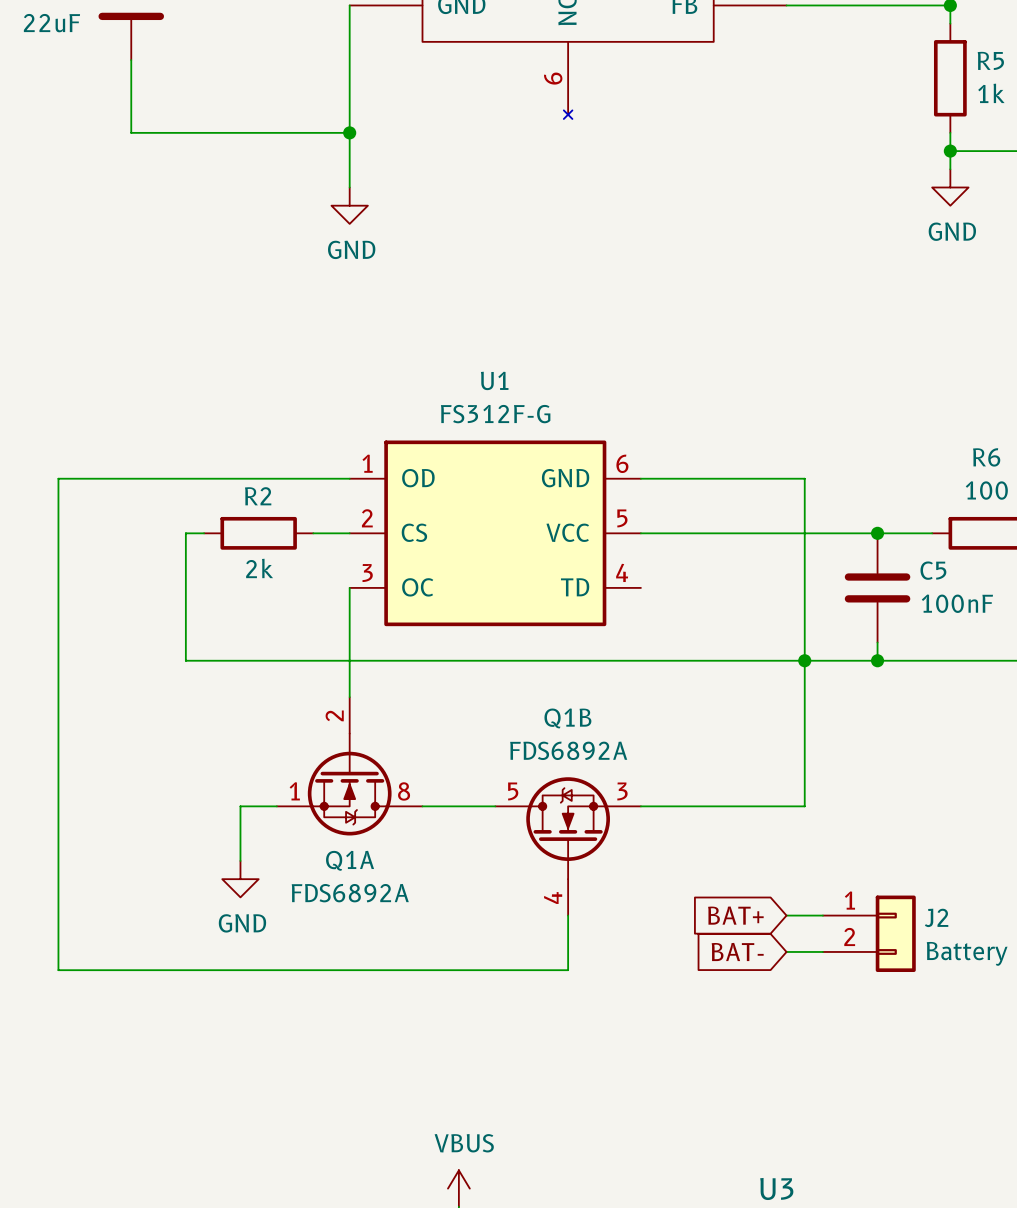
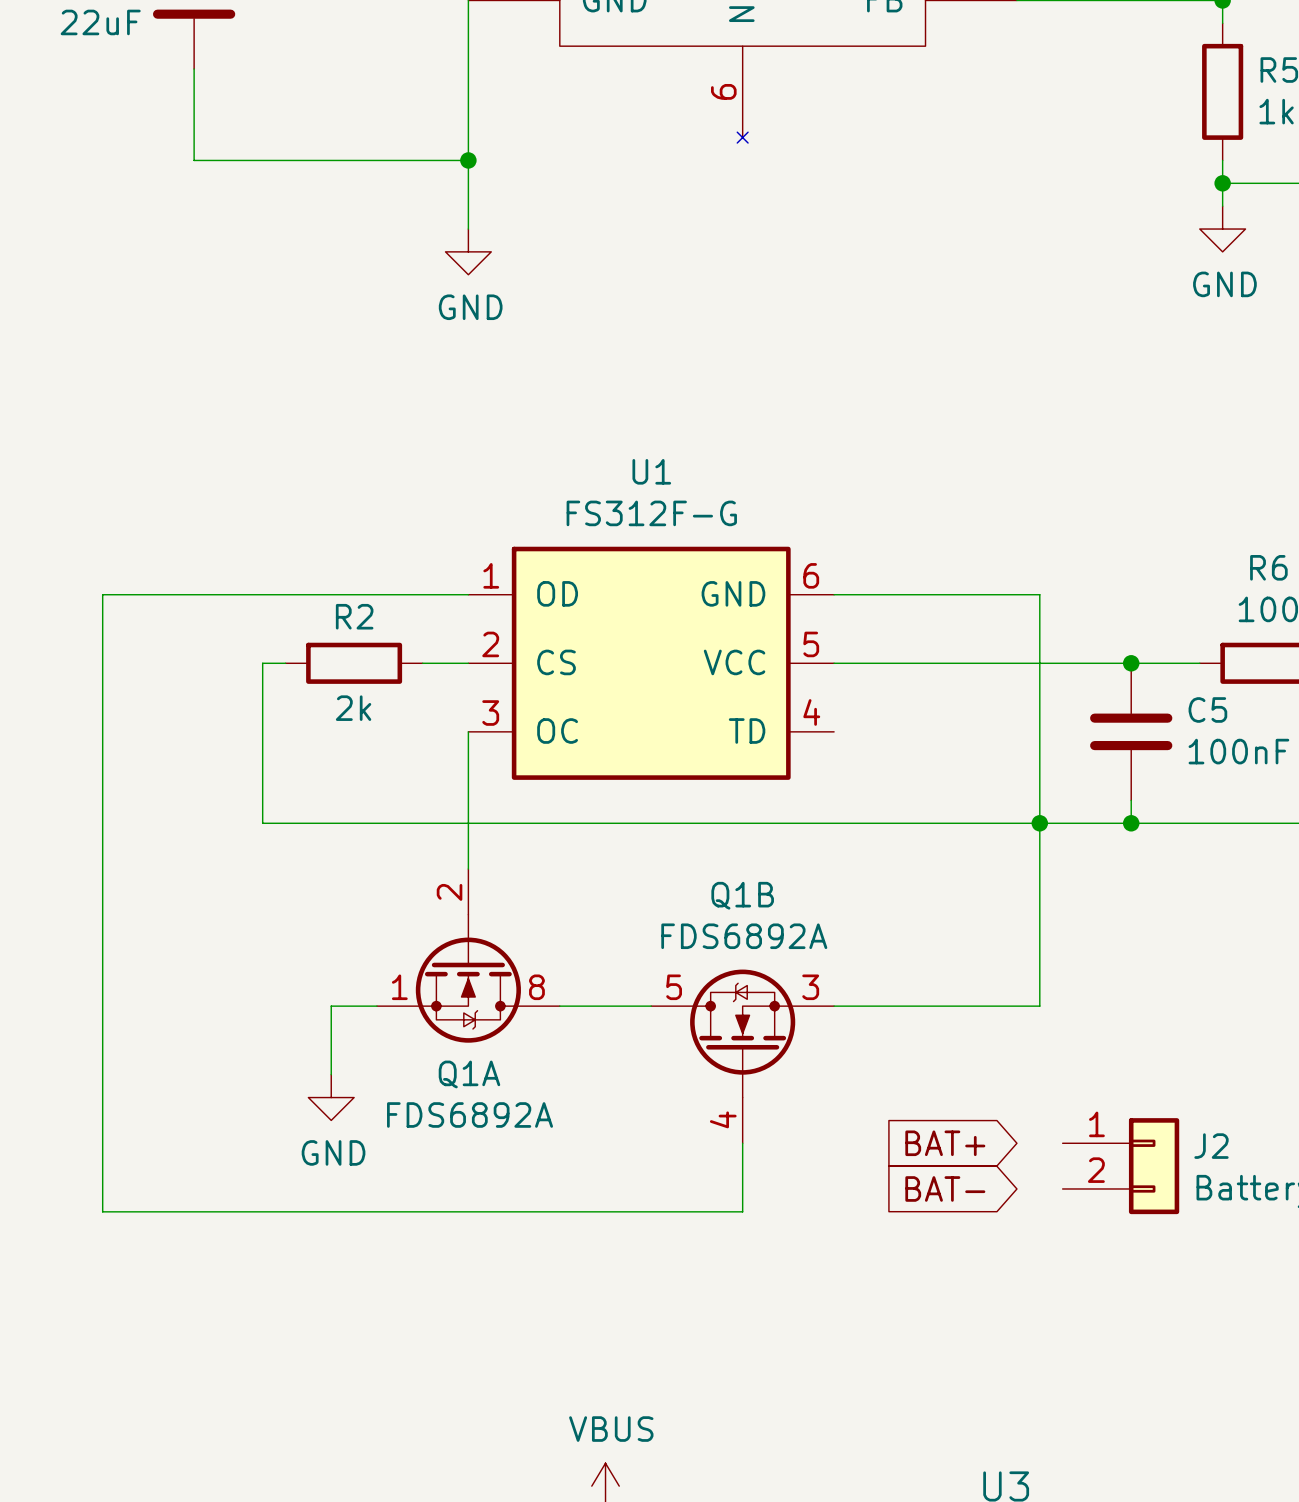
wire: (786, 915) (822, 915) -> none
wire: (786, 951) (822, 951) -> none

